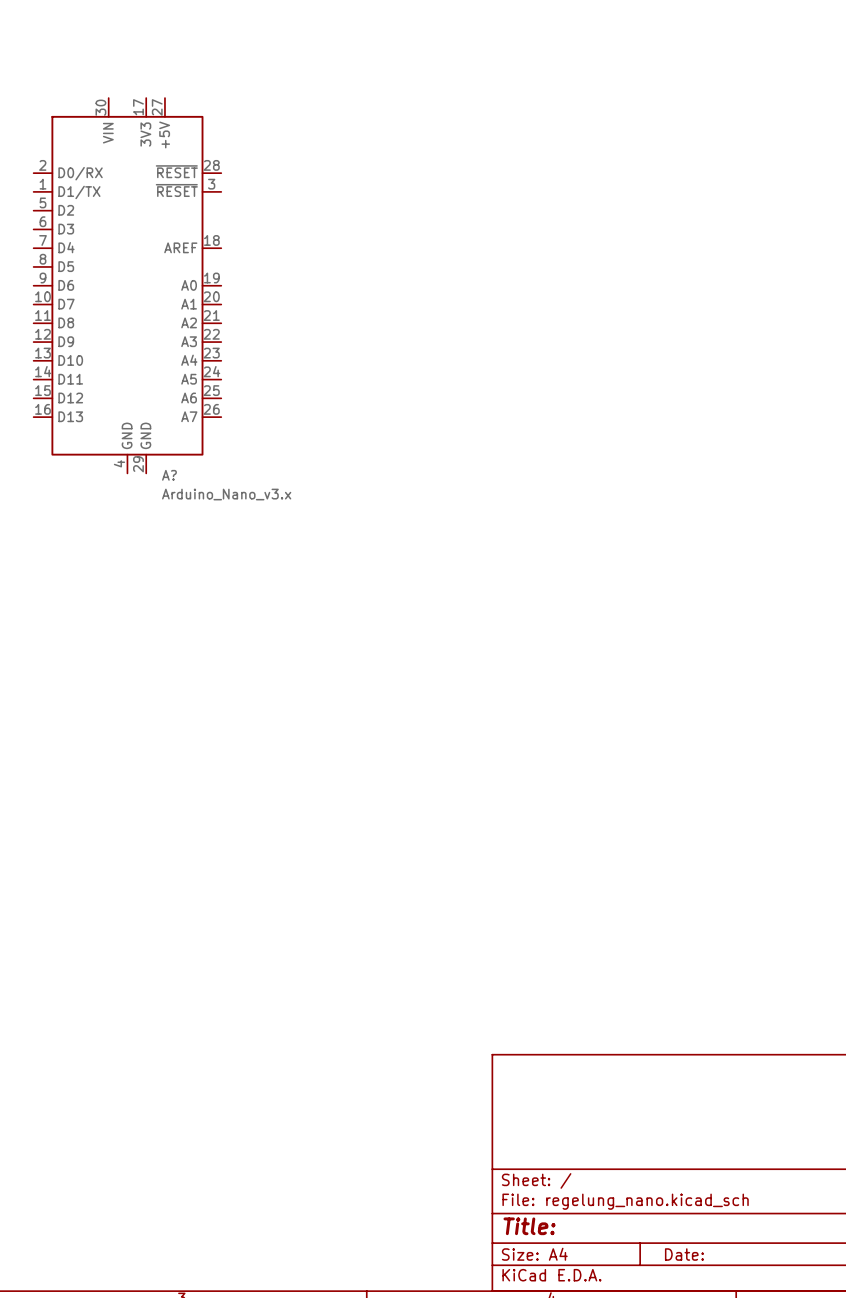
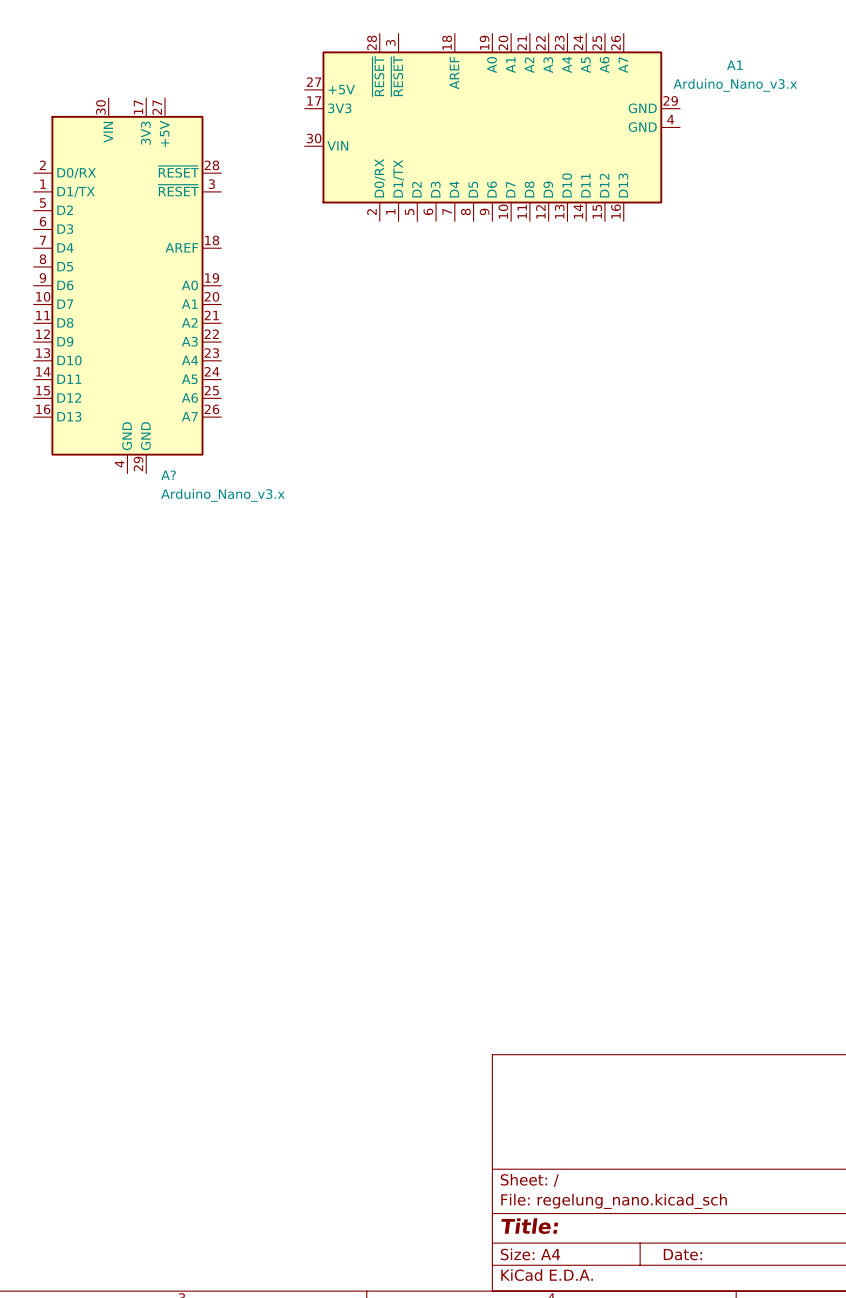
A1: none -> Arduino_Nano_v3.x (492, 127)

